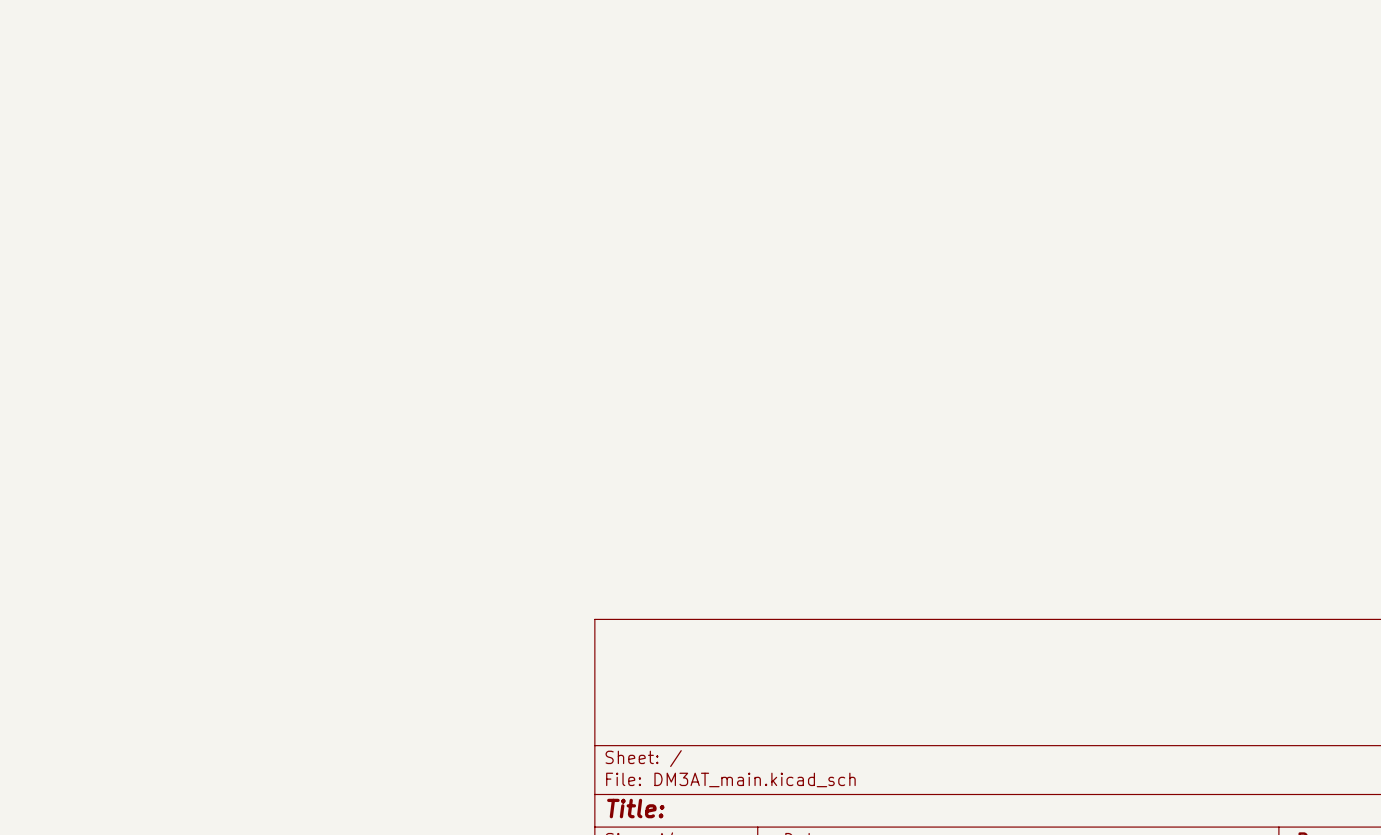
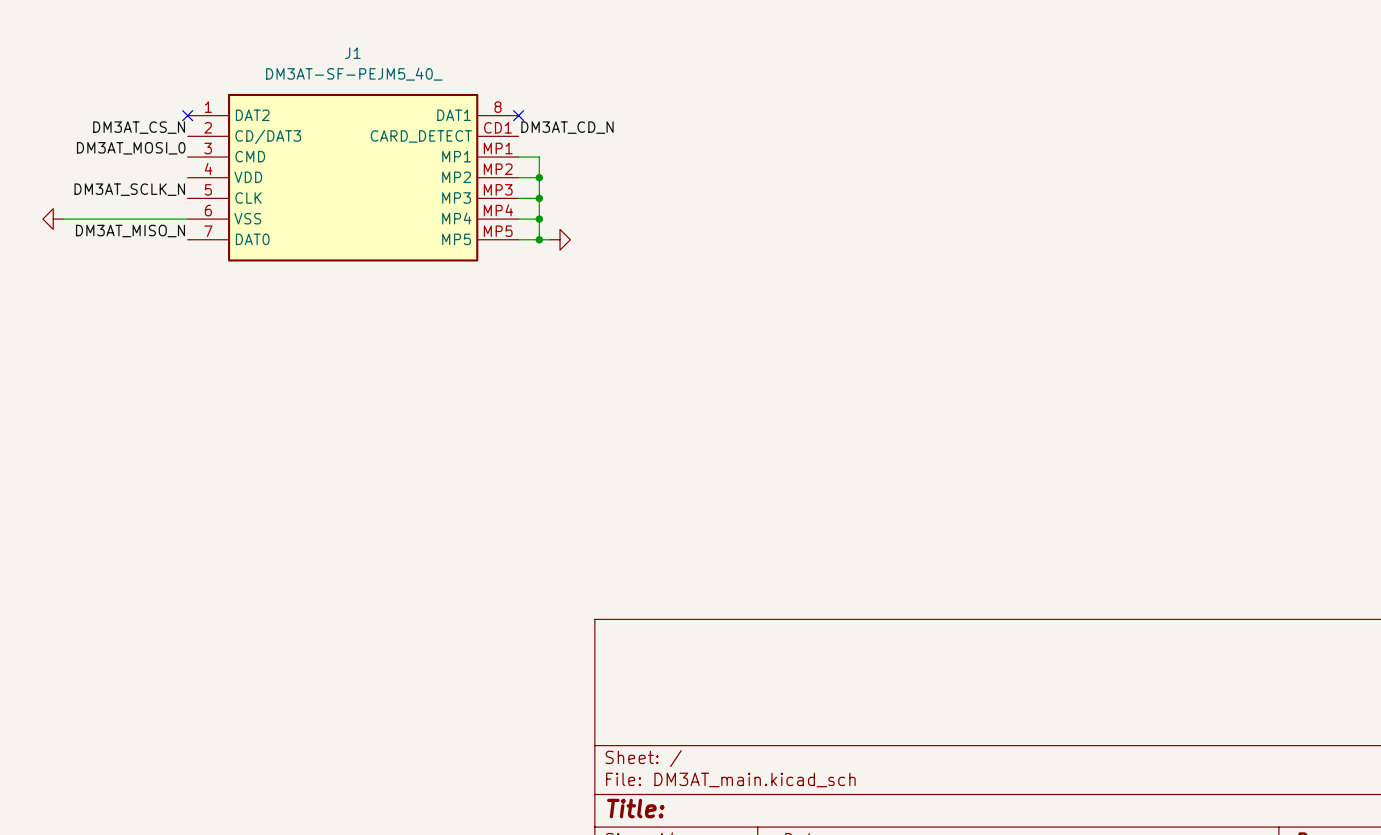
no-connect mark: none -> (187, 115)
no-connect mark: none -> (518, 115)
label: none -> DM3AT_CS_N (139, 127)
label: none -> DM3AT_CD_N (567, 127)
label: none -> DM3AT_MOSI_0 (131, 148)
wire: none -> (518, 157) (539, 157) (539, 239)
J1: none -> DM3AT-SF-PEJM5_40_ (353, 177)
wire: none -> (518, 177) (539, 177)
junction: none -> (539, 177)
label: none -> DM3AT_SCLK_N (129, 189)
wire: none -> (518, 198) (539, 198)
junction: none -> (539, 198)
power symbol: none -> (53, 219)
wire: none -> (63, 219) (187, 219)
wire: none -> (518, 219) (539, 219)
junction: none -> (539, 219)
label: none -> DM3AT_MISO_N (130, 231)
wire: none -> (518, 239) (549, 239)
junction: none -> (539, 239)
power symbol: none -> (560, 239)

